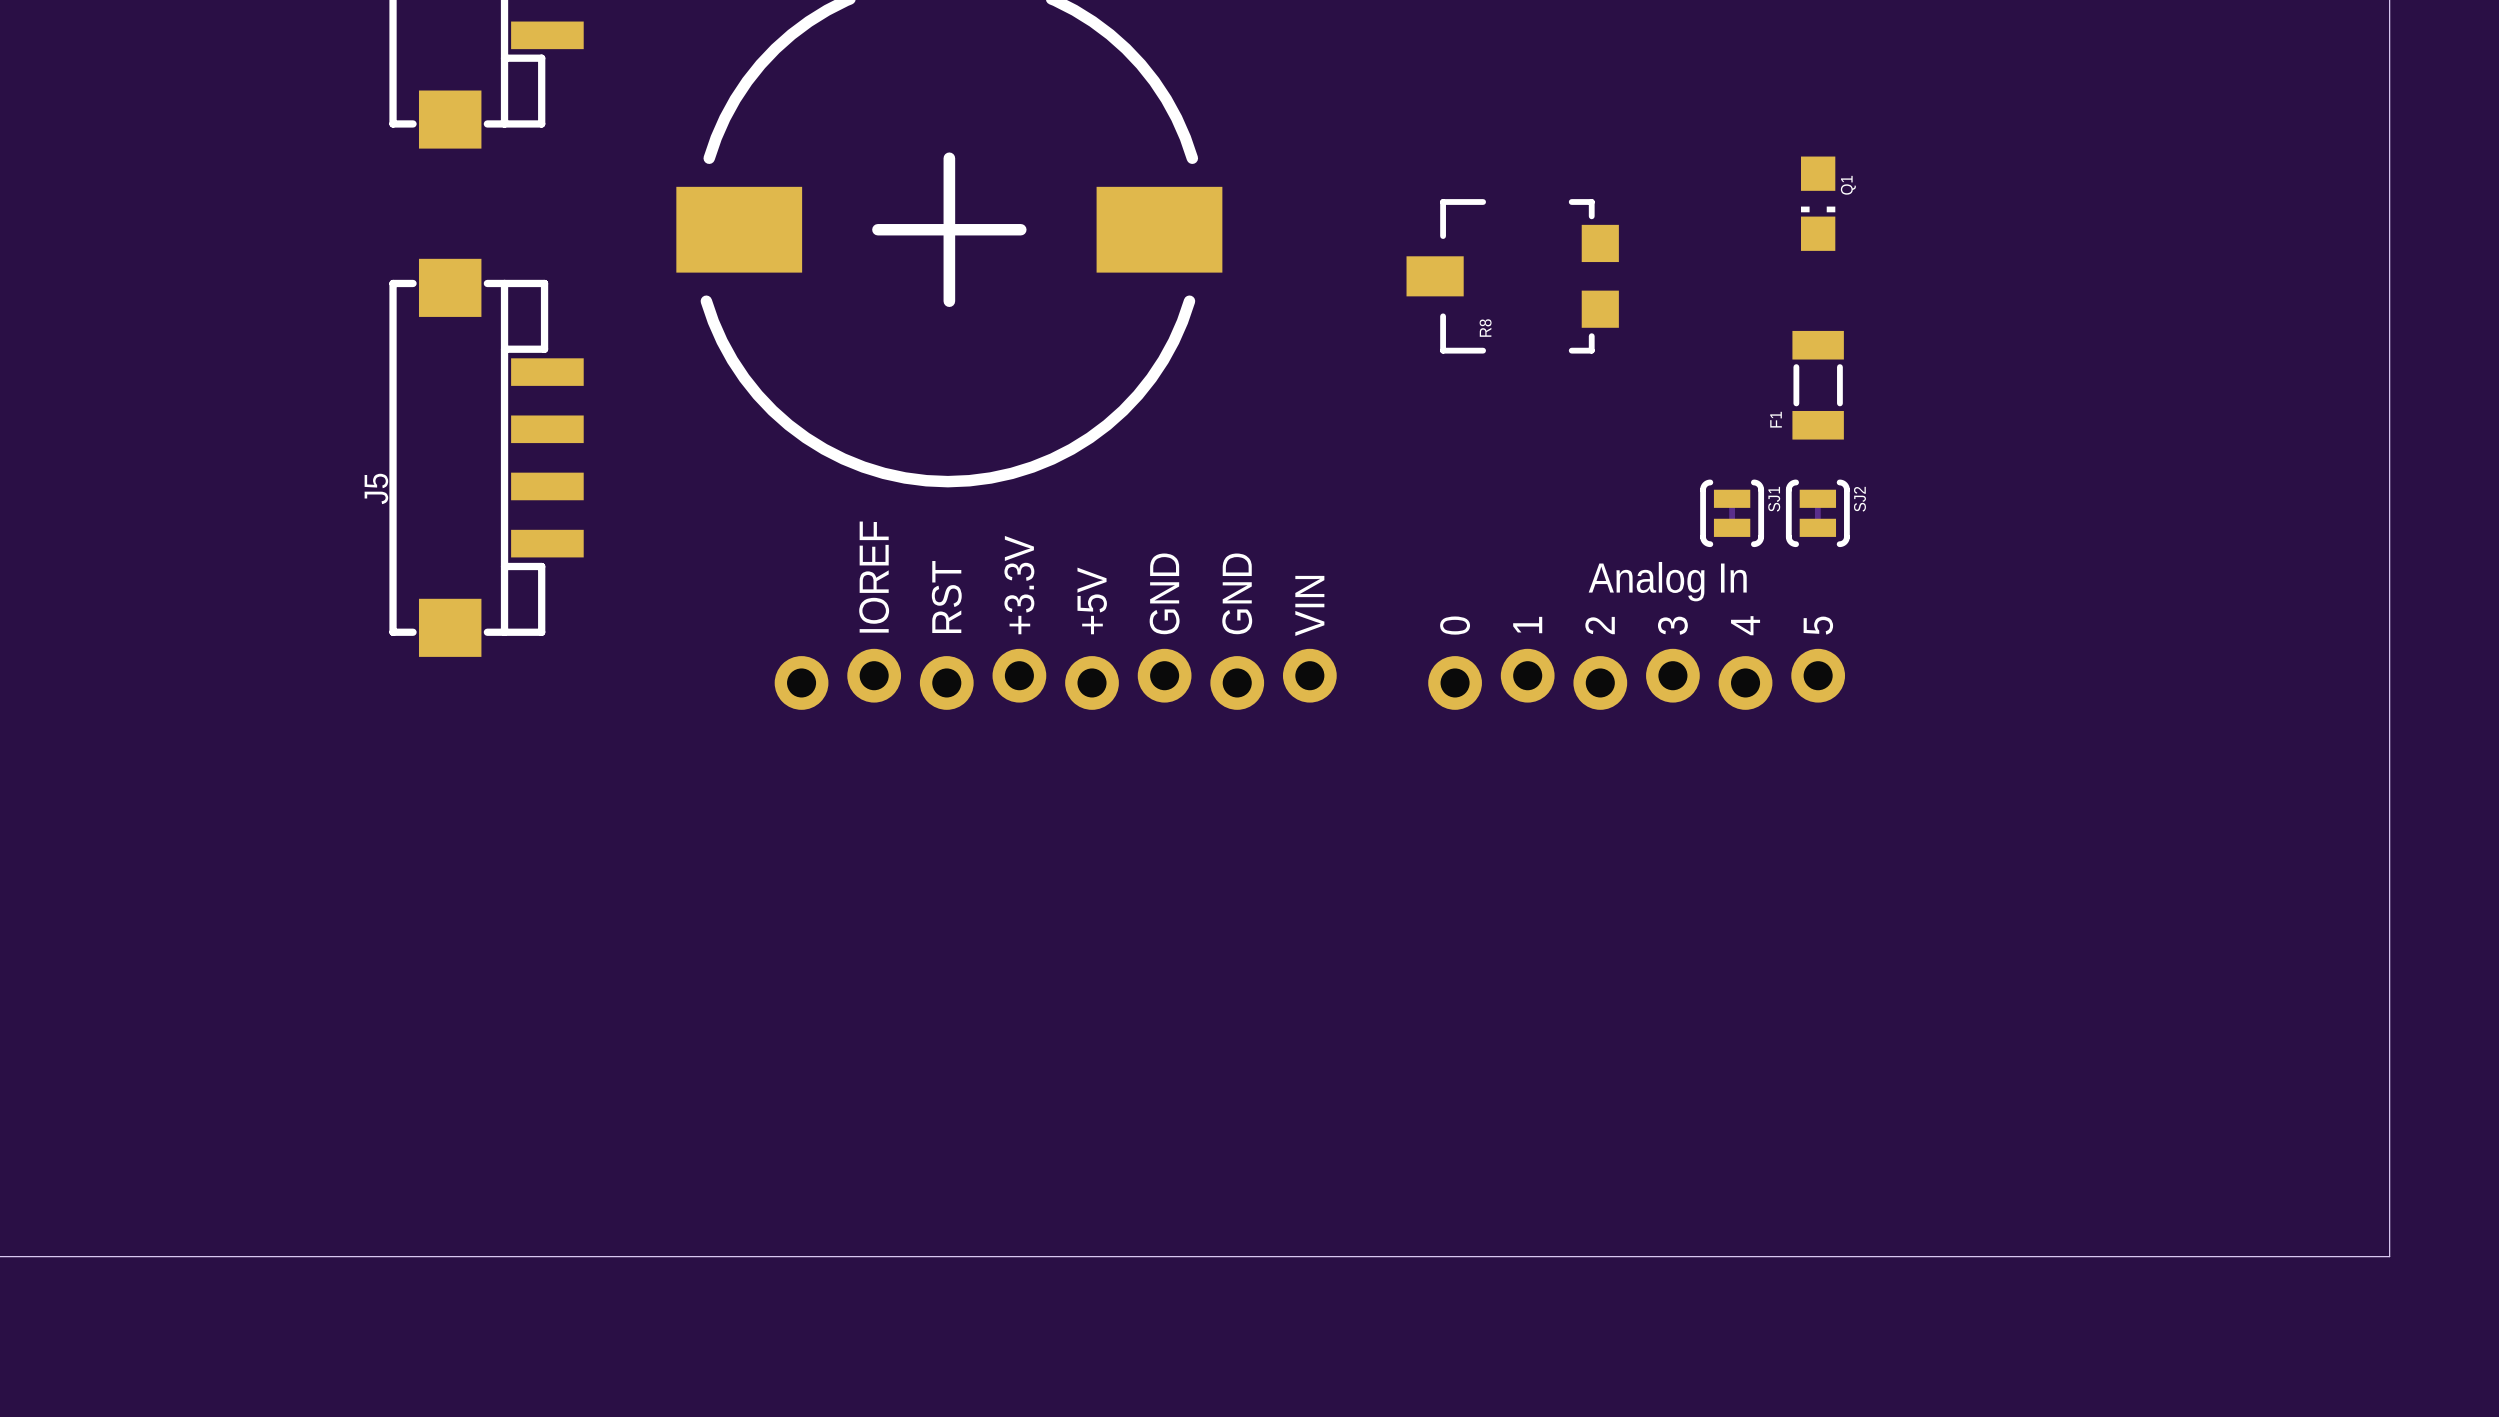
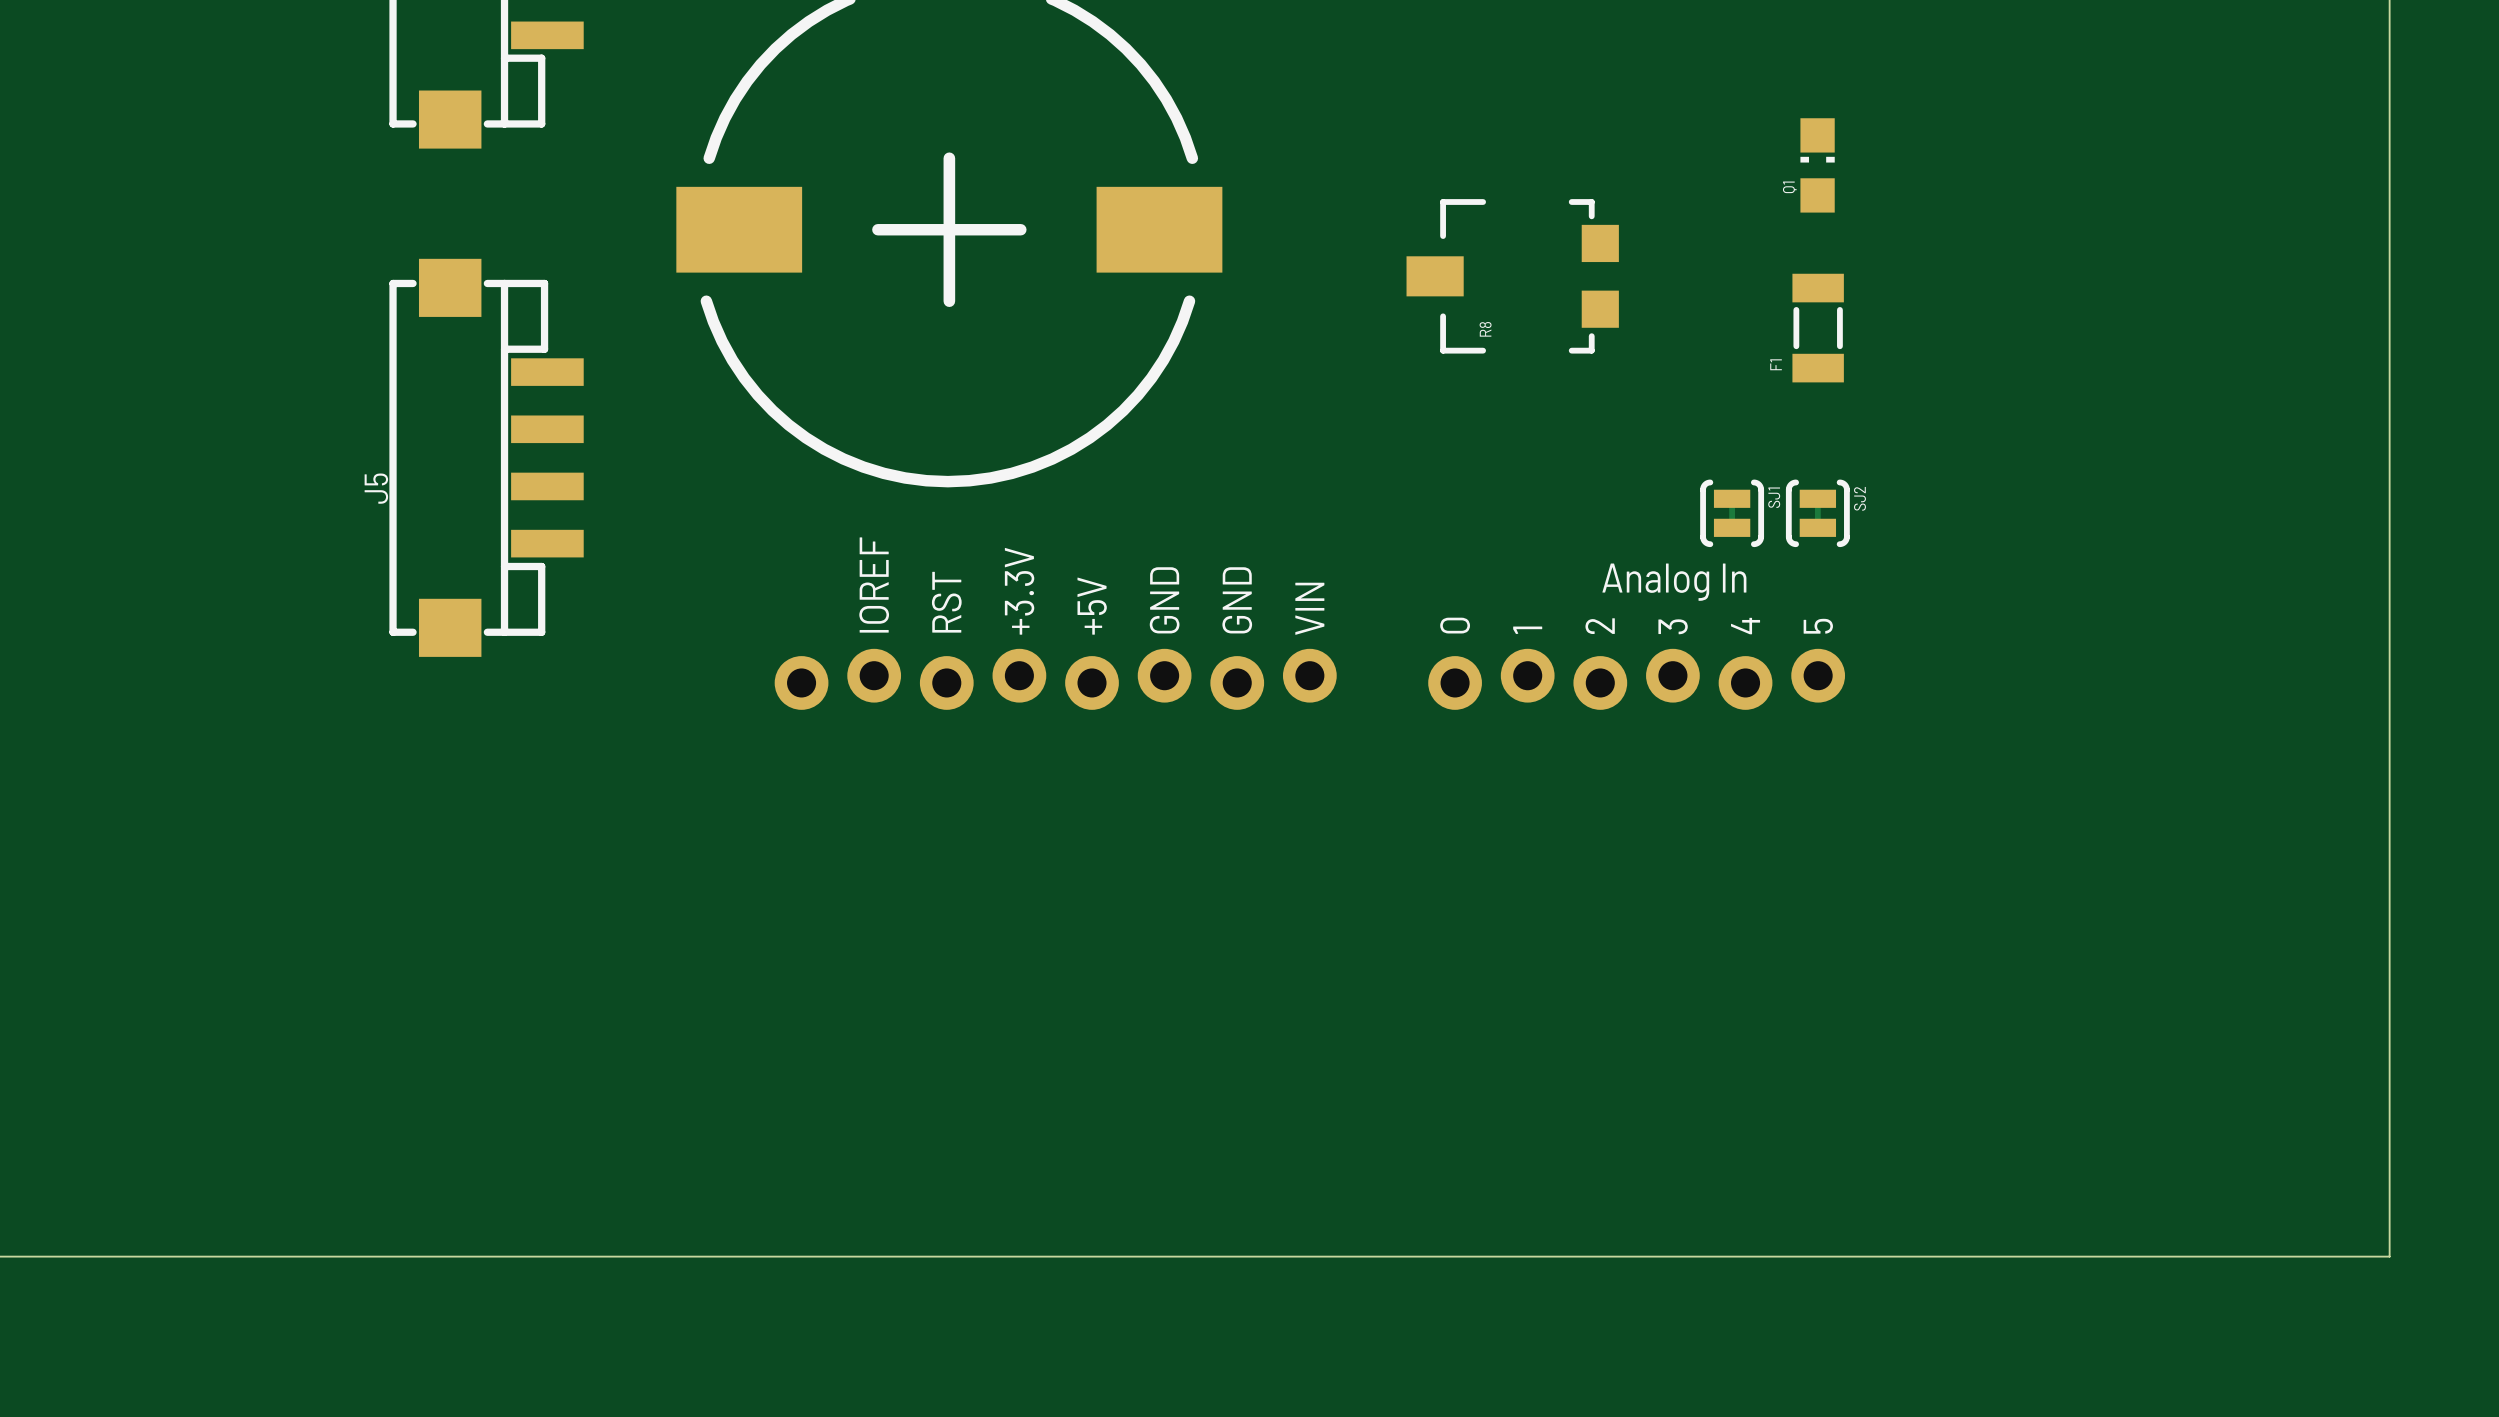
Q1 rotation: 0° (1818, 203) -> 180° (1817, 165)
F1 position: (1818, 385) -> (1818, 328)

